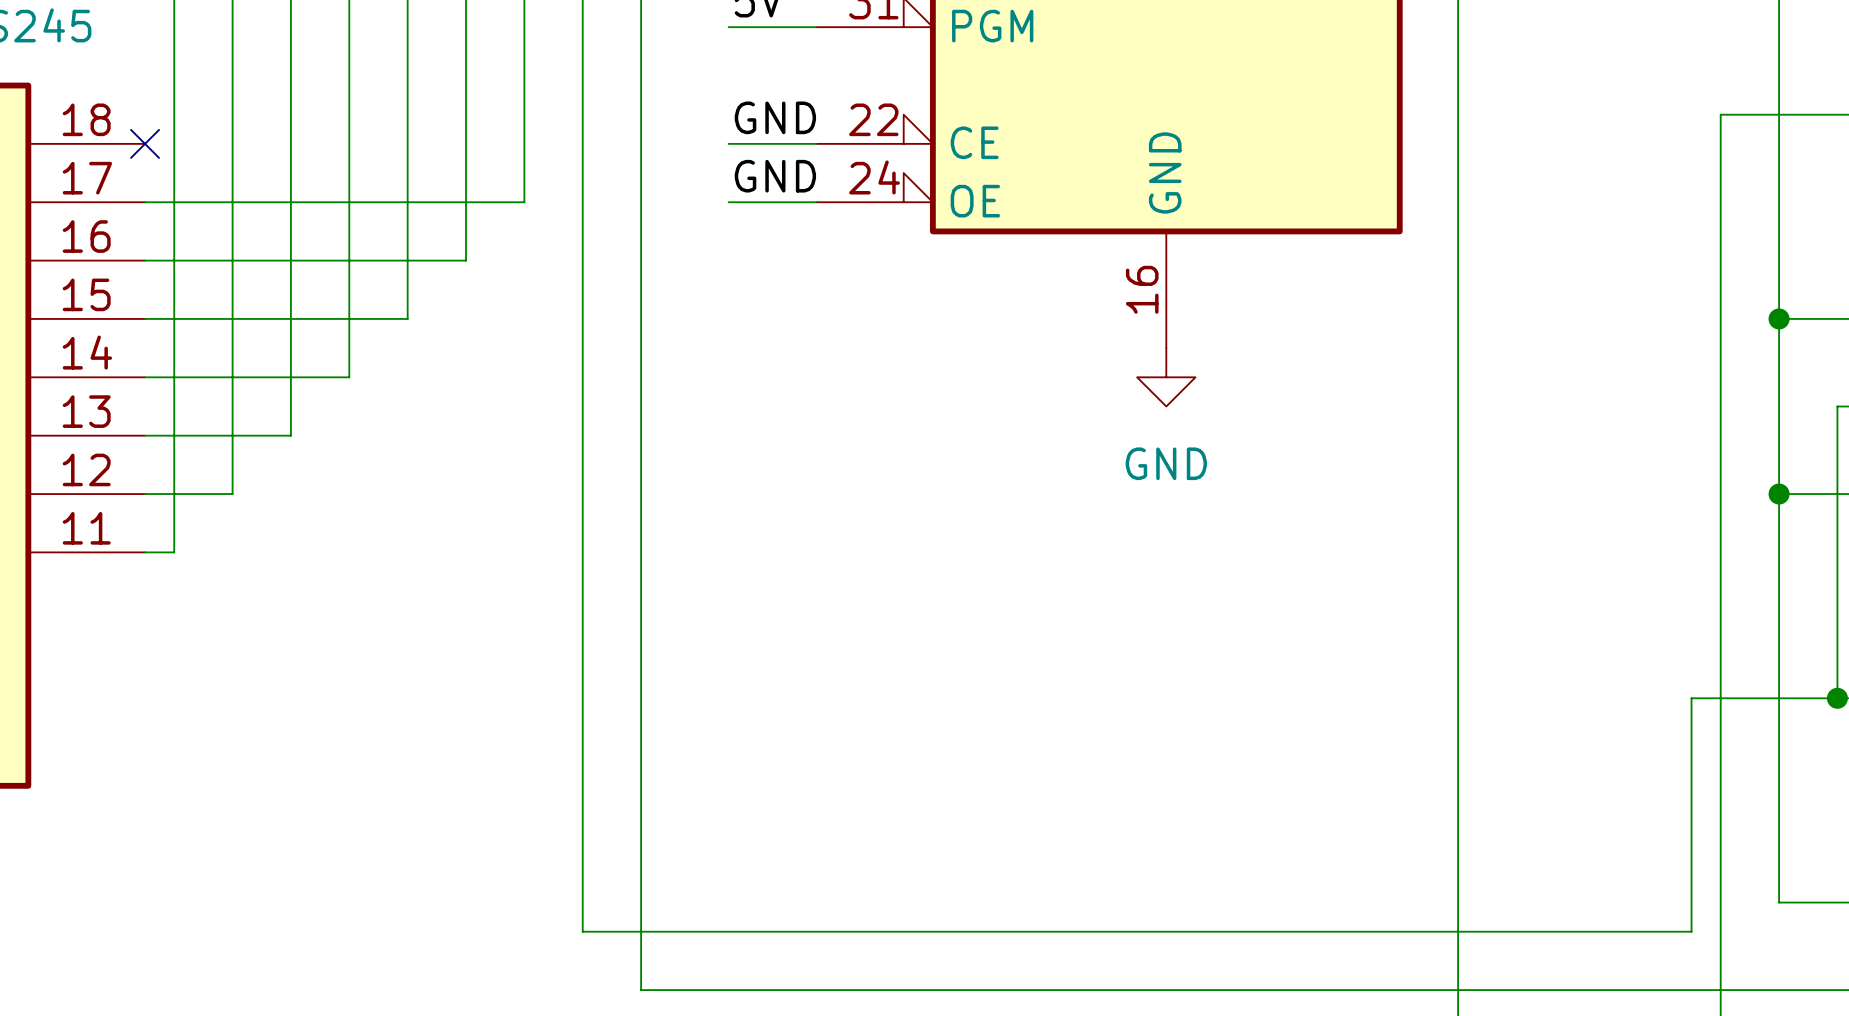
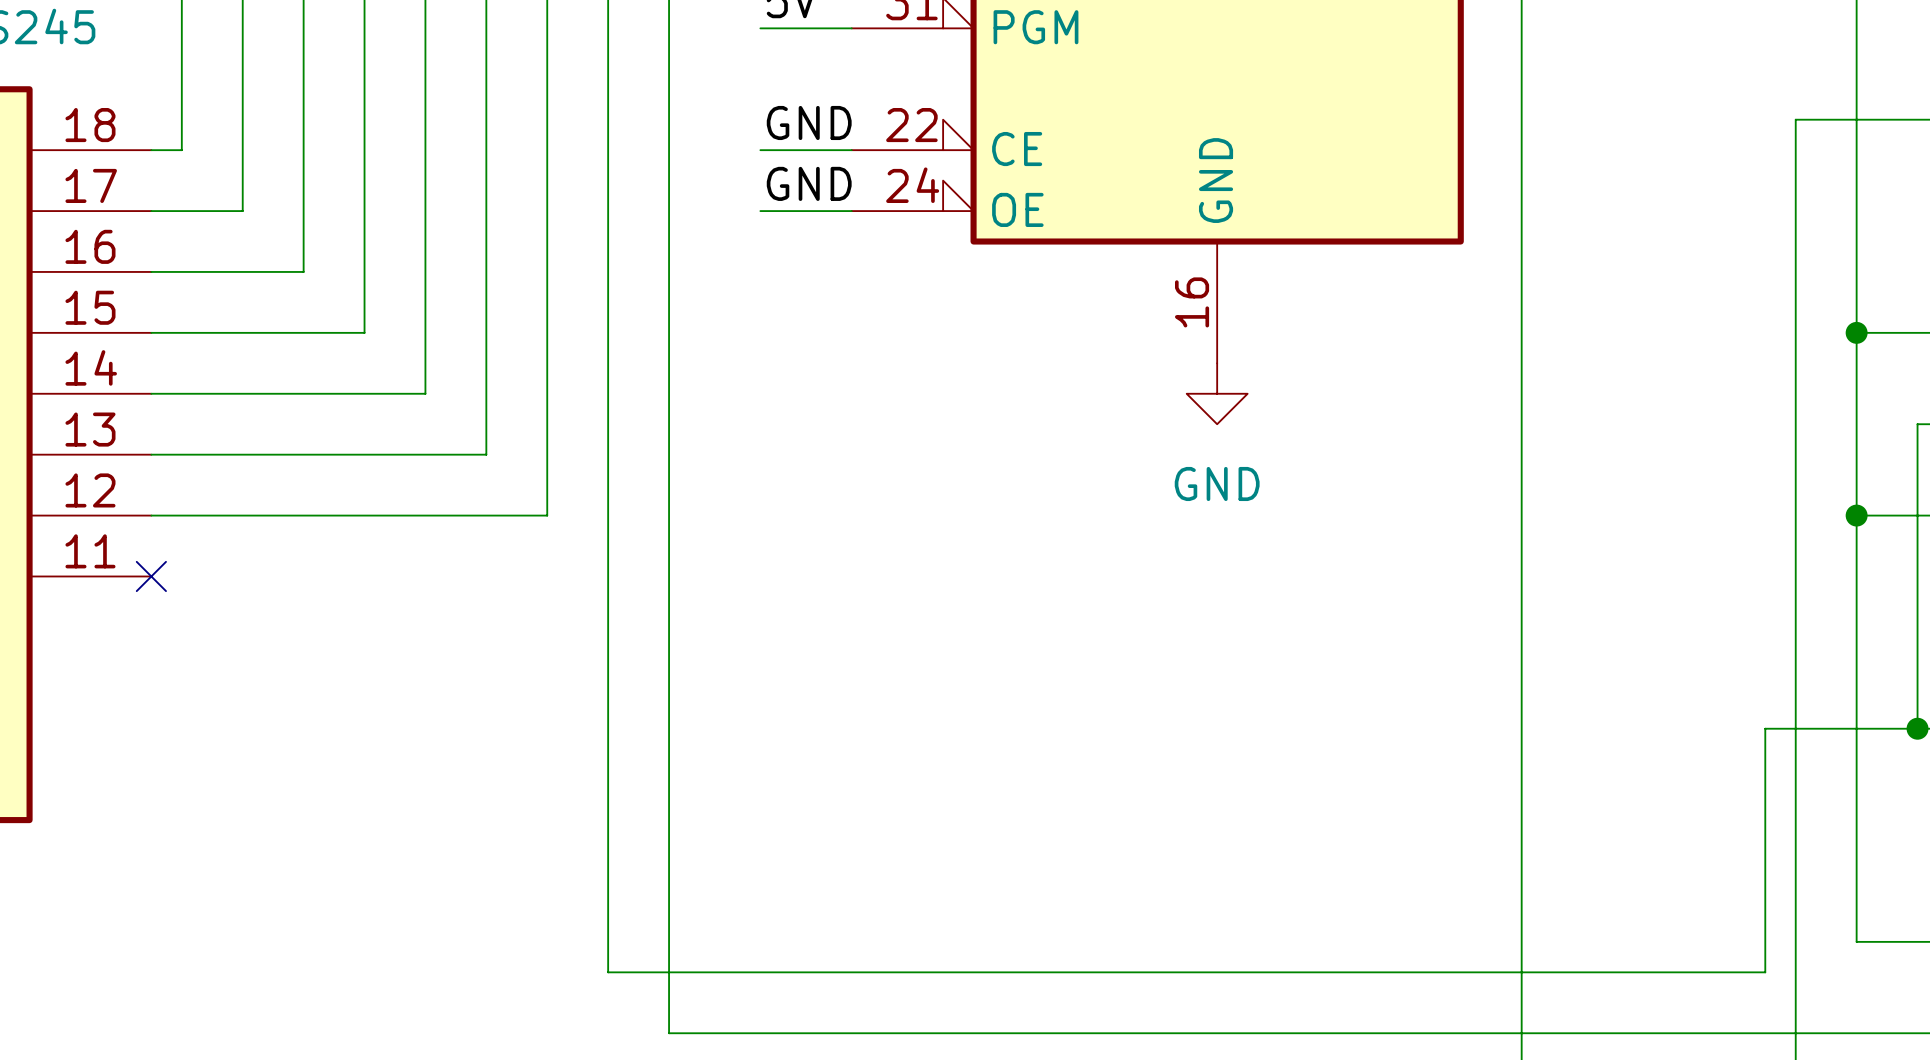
no-connect mark: (145, 143) -> none
wire: (174, 143) (174, 552) (145, 552) -> (181, 150) (151, 150)
wire: (524, 202) (232, 202) (232, 494) -> (547, 211) (547, 515) (242, 515)
wire: (466, 260) (290, 260) (290, 435) -> (486, 271) (486, 454) (303, 454)
wire: (407, 318) (349, 318) (349, 377) -> (425, 332) (425, 393) (364, 393)
no-connect mark: none -> (151, 576)

